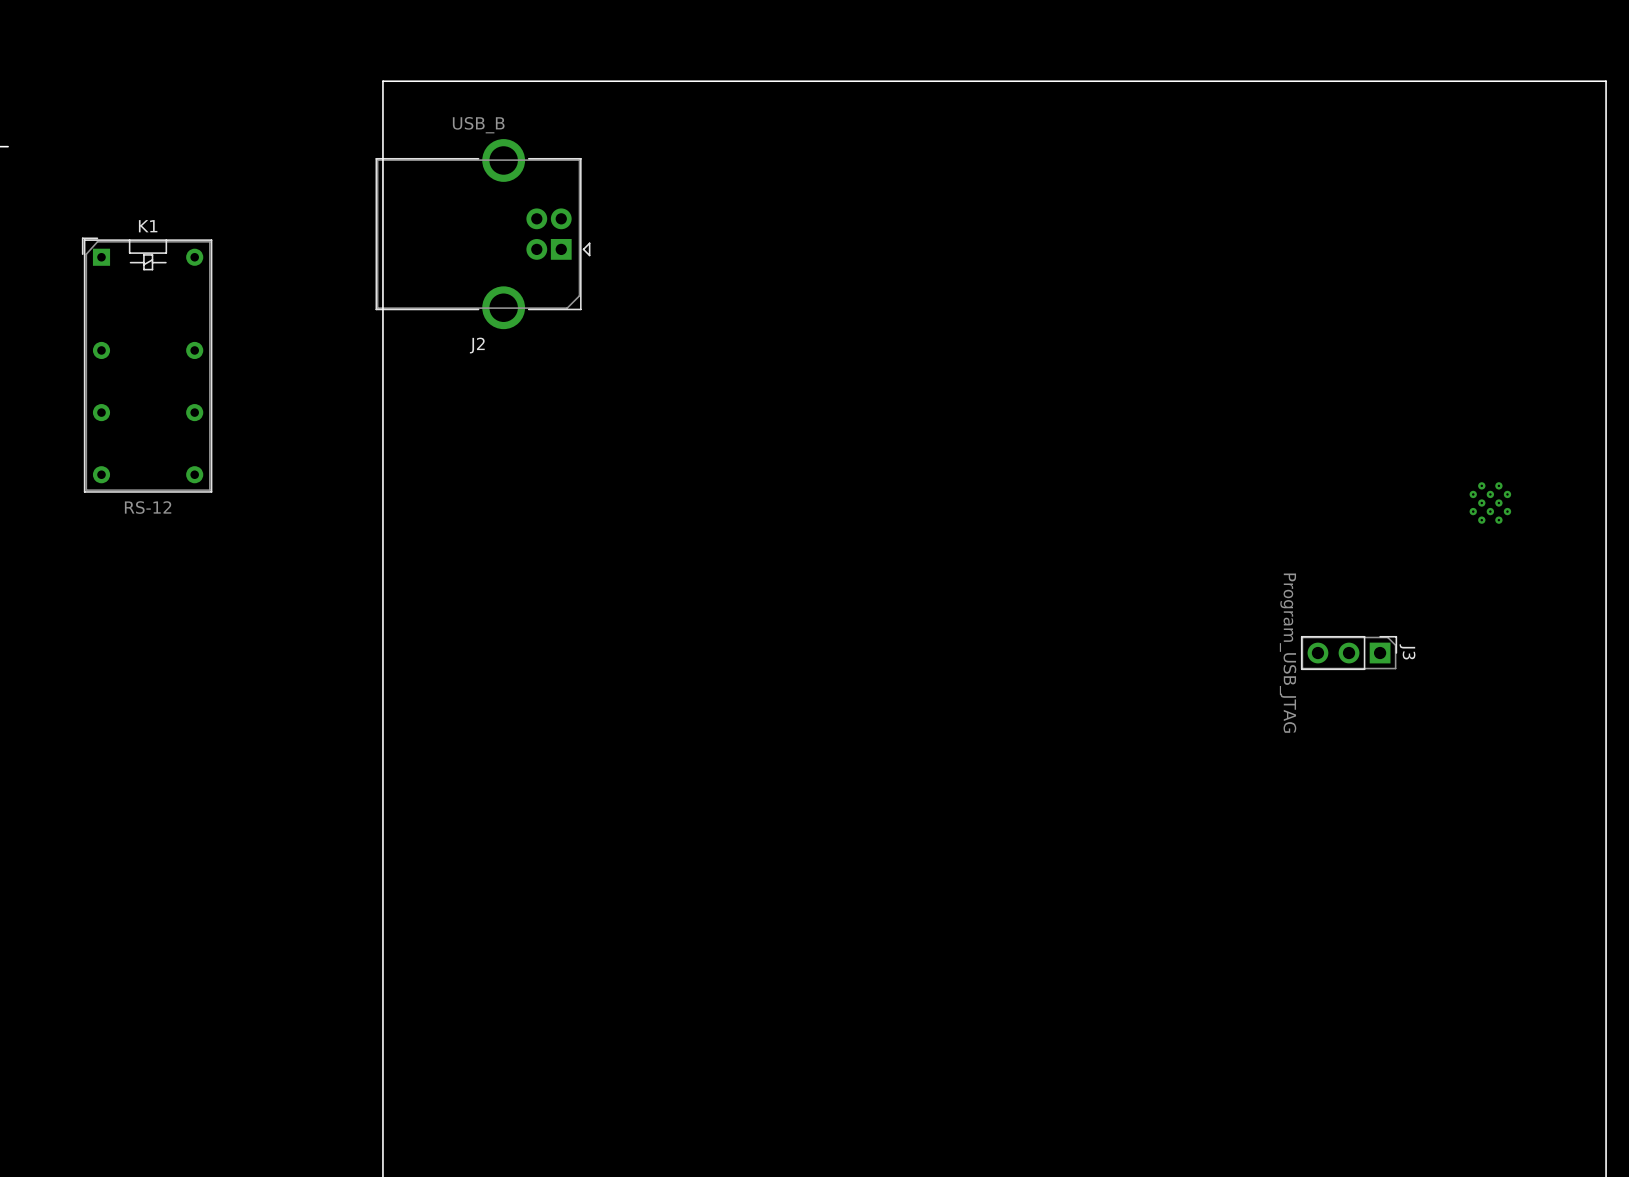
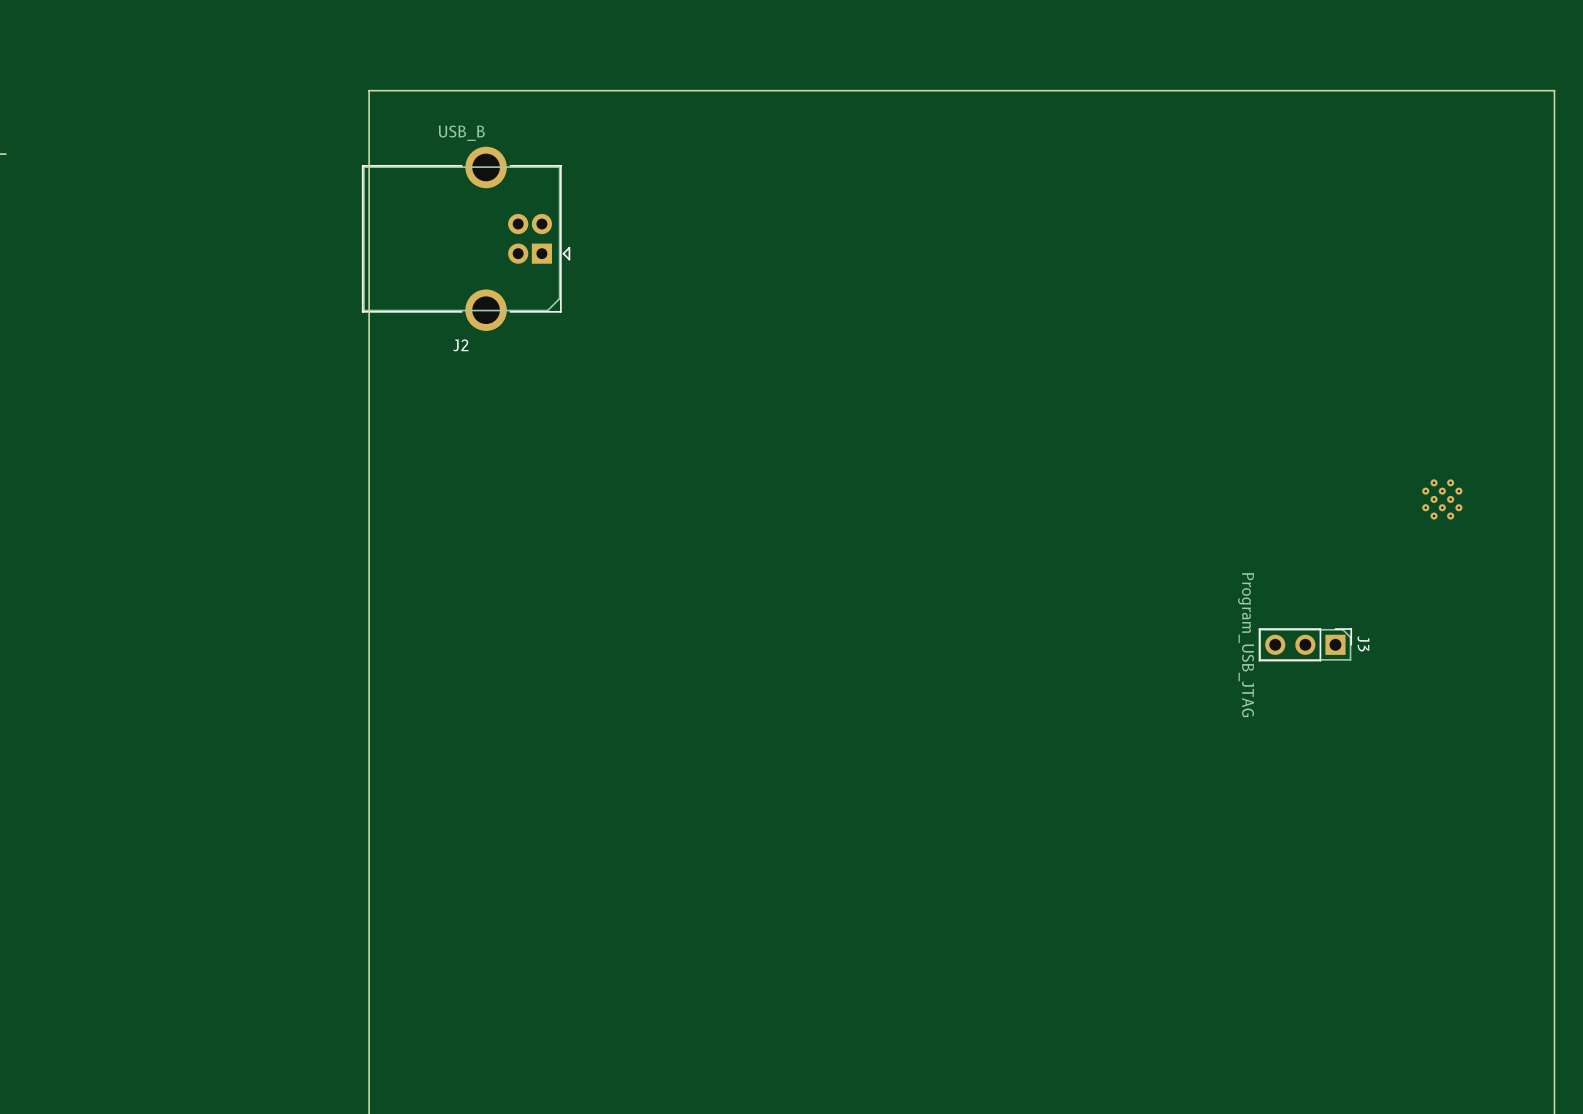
K1: RS-12 (147, 365) -> none

